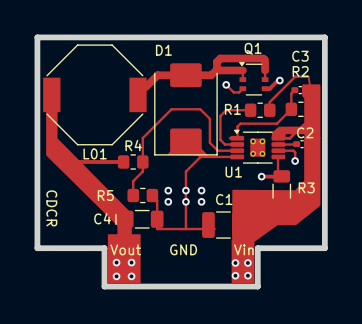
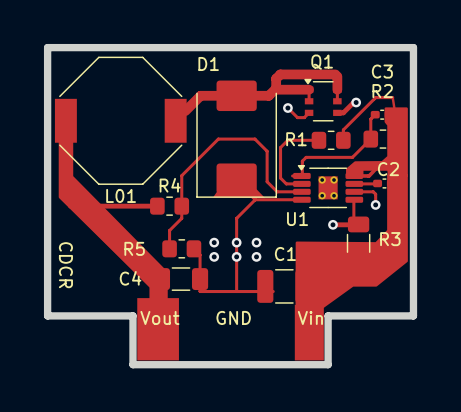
line: (115, 214) (115, 224) -> none
via: (116, 262) -> none
via: (131, 262) -> none
via: (235, 262) -> none
via: (247, 262) -> none
via: (235, 275) -> none
via: (247, 275) -> none
via: (116, 276) -> none
via: (131, 276) -> none

